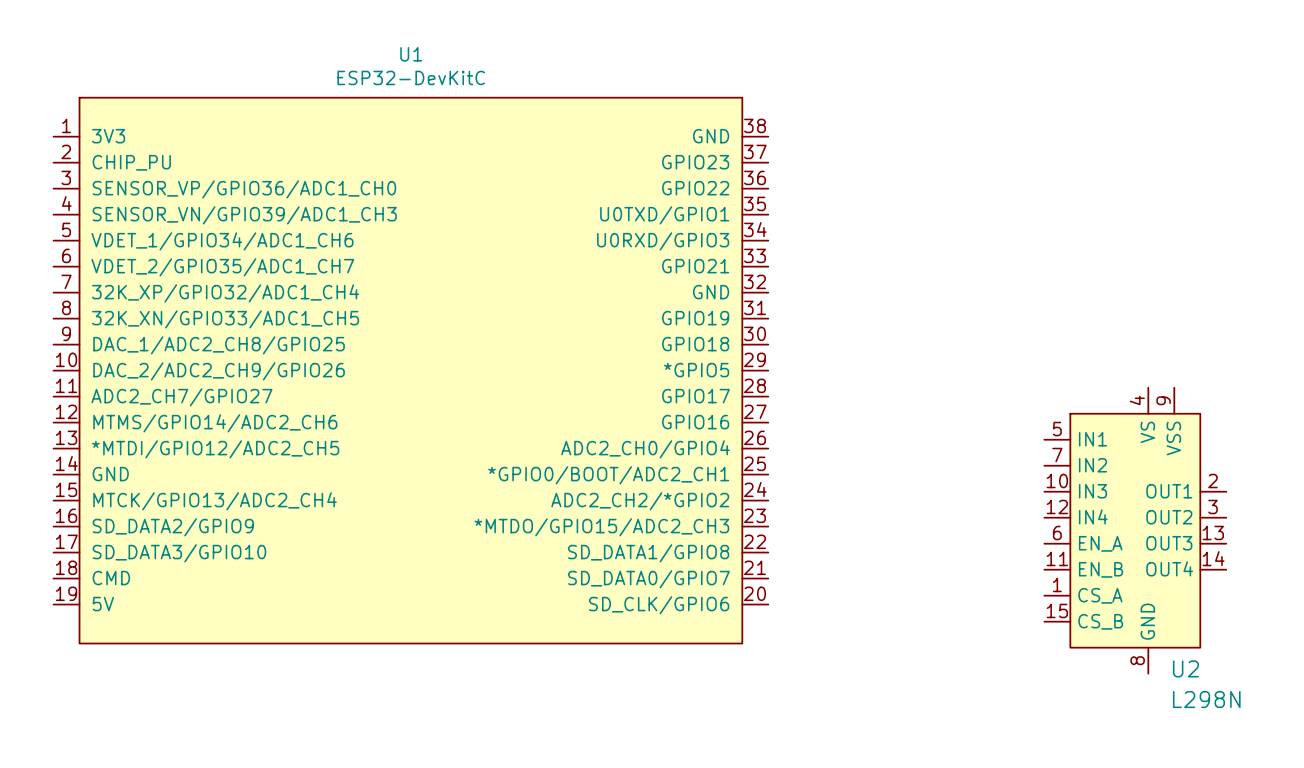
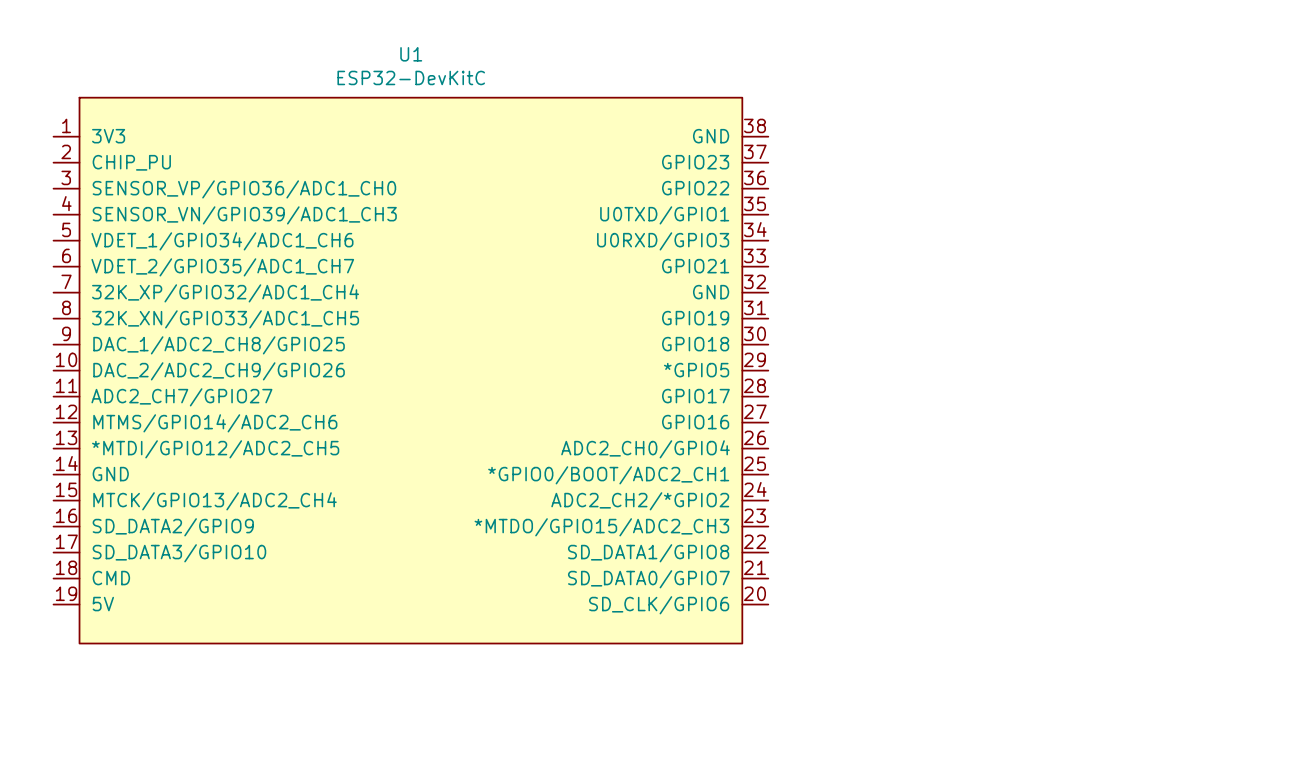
U2: L298N (1135, 530) -> none

